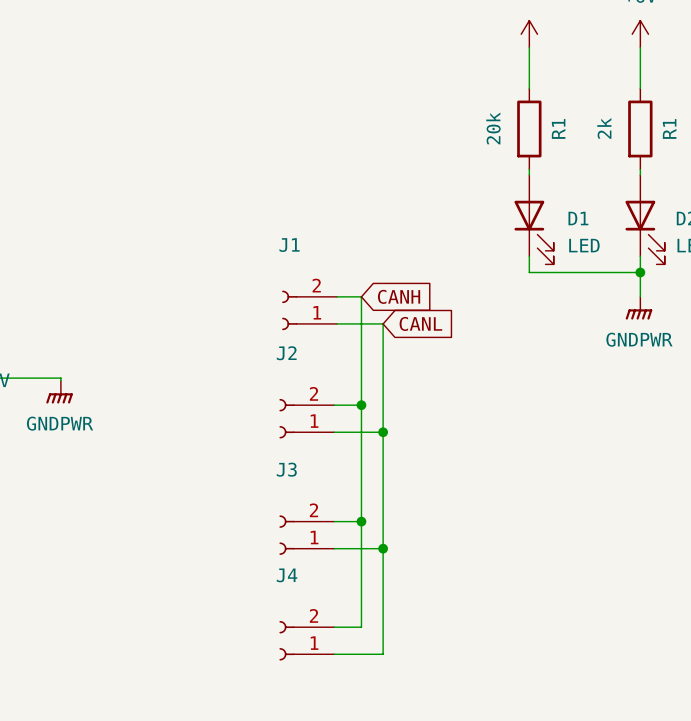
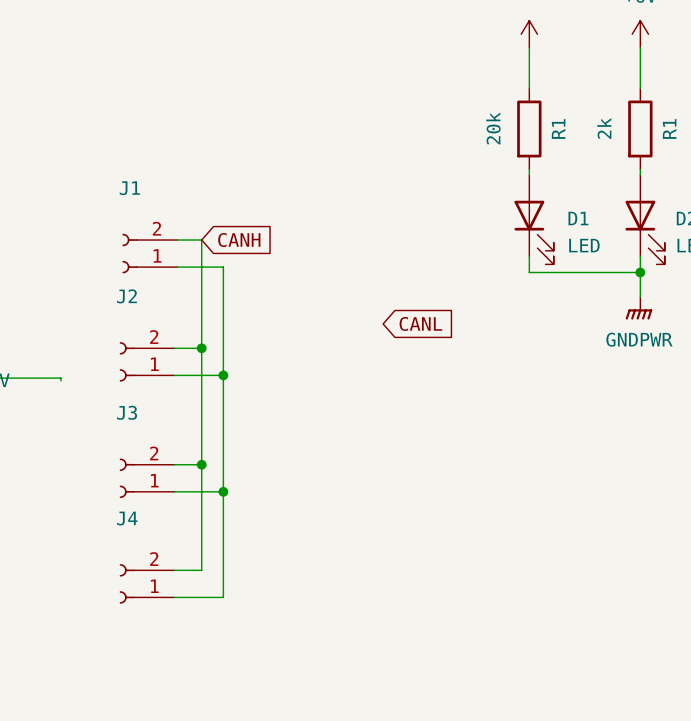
wire: (337, 296) (361, 296) (361, 627) (334, 627) -> (177, 240) (201, 240) (201, 570) (174, 570)
global label position: CANH (399, 296) -> CANH (239, 240)
J1 position: (309, 310) -> (149, 253)
wire: (337, 323) (383, 323) (383, 654) (334, 654) -> (177, 267) (223, 267) (223, 597) (174, 597)
junction: none -> (201, 348)
junction: none -> (223, 375)
power symbol: GNDPWR (59, 392) -> none
wire: (334, 405) (361, 405) -> (174, 348) (201, 348)
junction: (361, 405) -> none
J2 position: (306, 418) -> (147, 361)
wire: (334, 432) (383, 432) -> (174, 375) (223, 375)
junction: (383, 432) -> none
junction: none -> (201, 464)
junction: none -> (223, 491)
wire: (334, 521) (361, 521) -> (174, 464) (201, 464)
junction: (361, 521) -> none
J3 position: (306, 535) -> (147, 478)
wire: (334, 548) (383, 548) -> (174, 491) (223, 491)
junction: (383, 548) -> none
J4 position: (306, 640) -> (147, 583)

